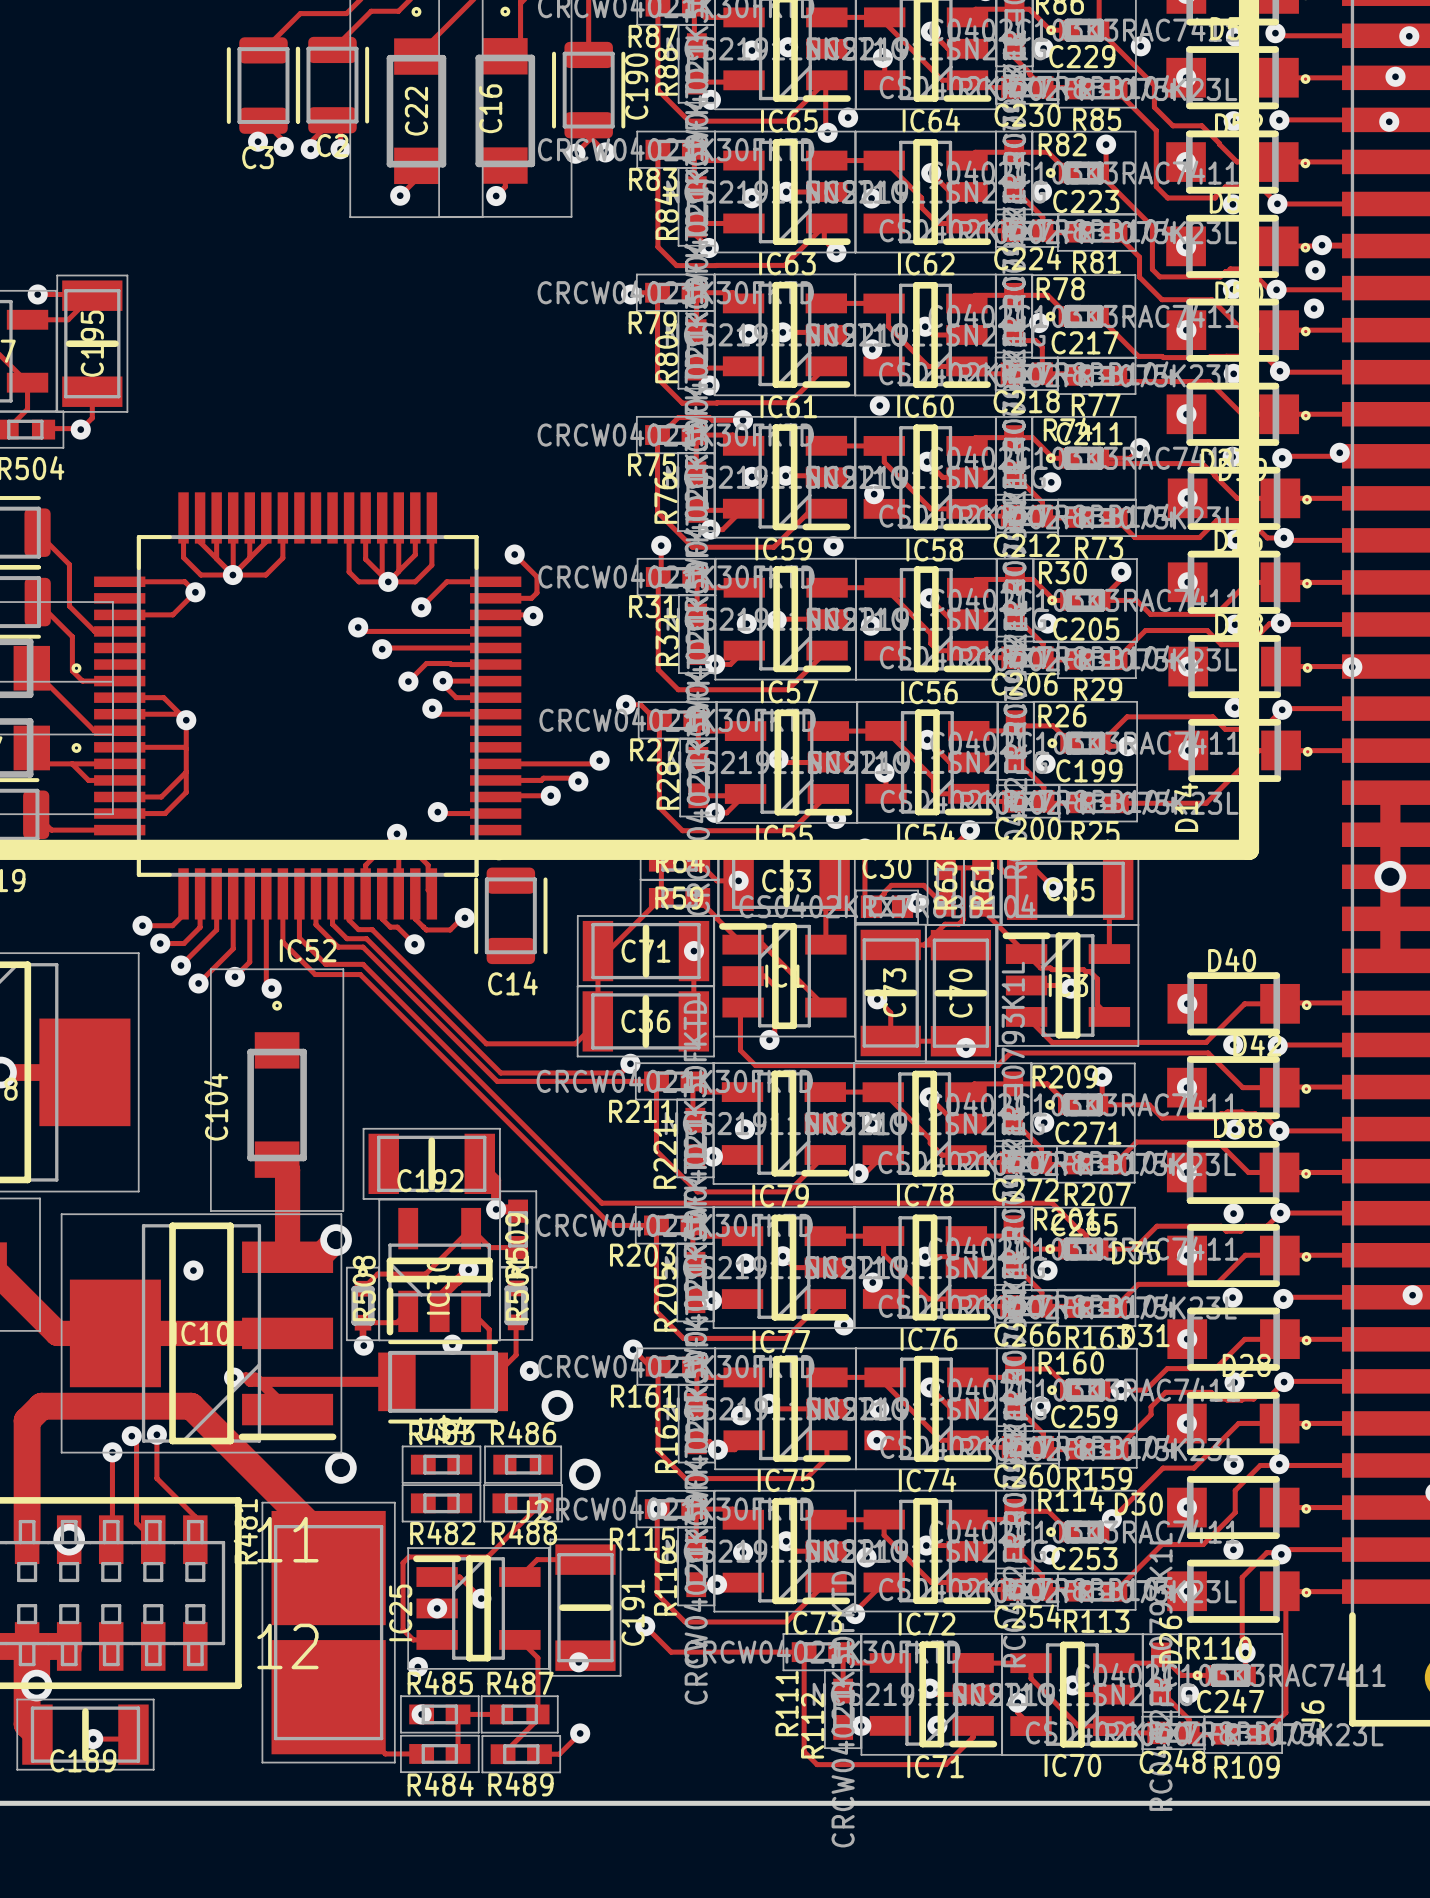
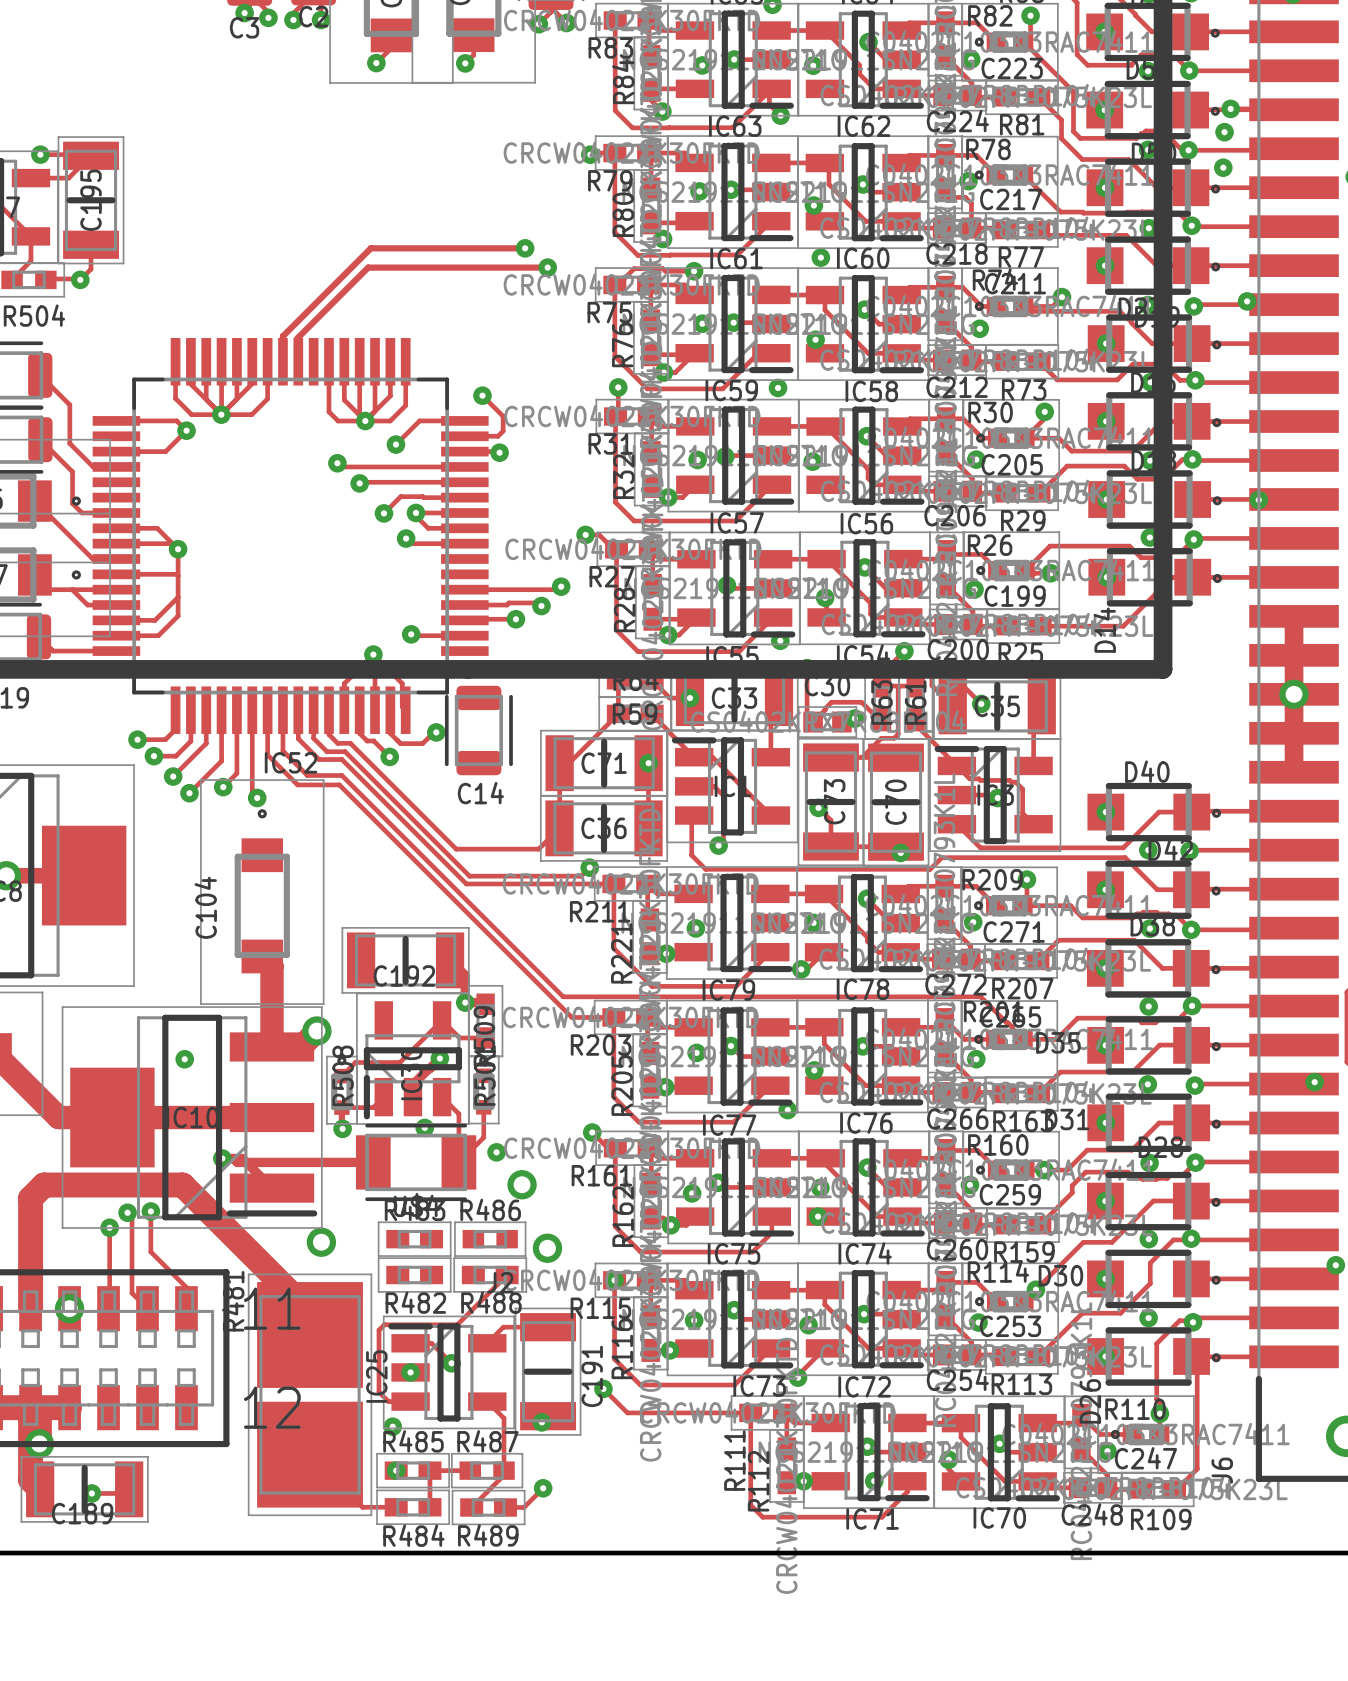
track: none -> (525, 248) (370, 248) (282, 336) (282, 361)
via: none -> (525, 248)
track: none -> (547, 267) (368, 267) (297, 338) (298, 361)
via: none -> (547, 267)

